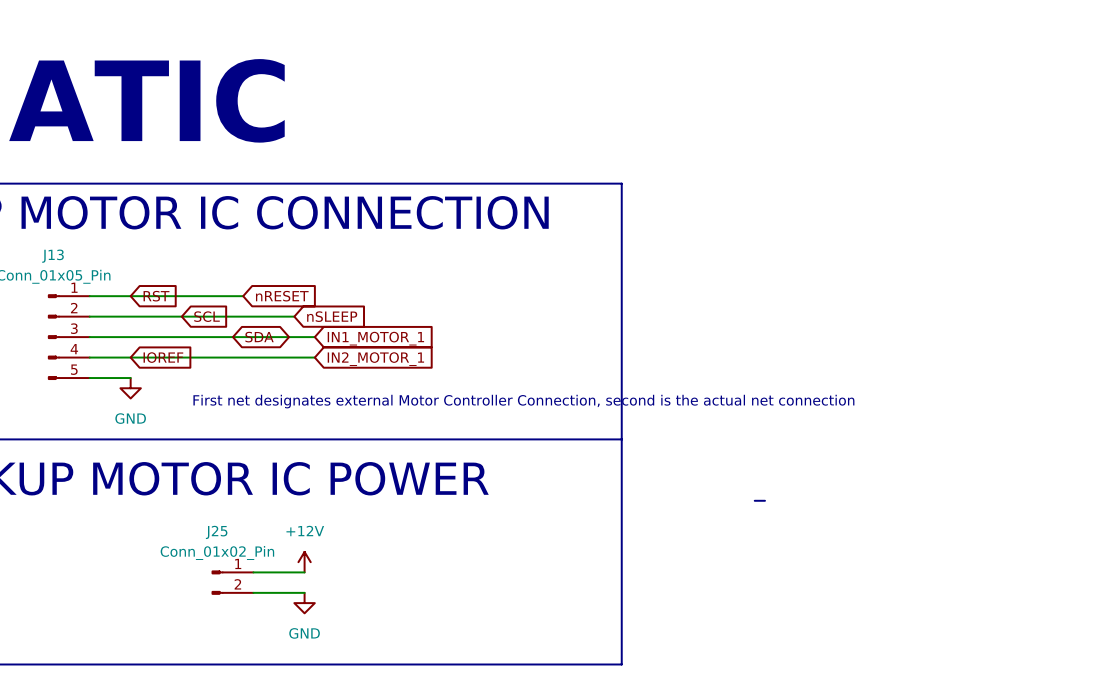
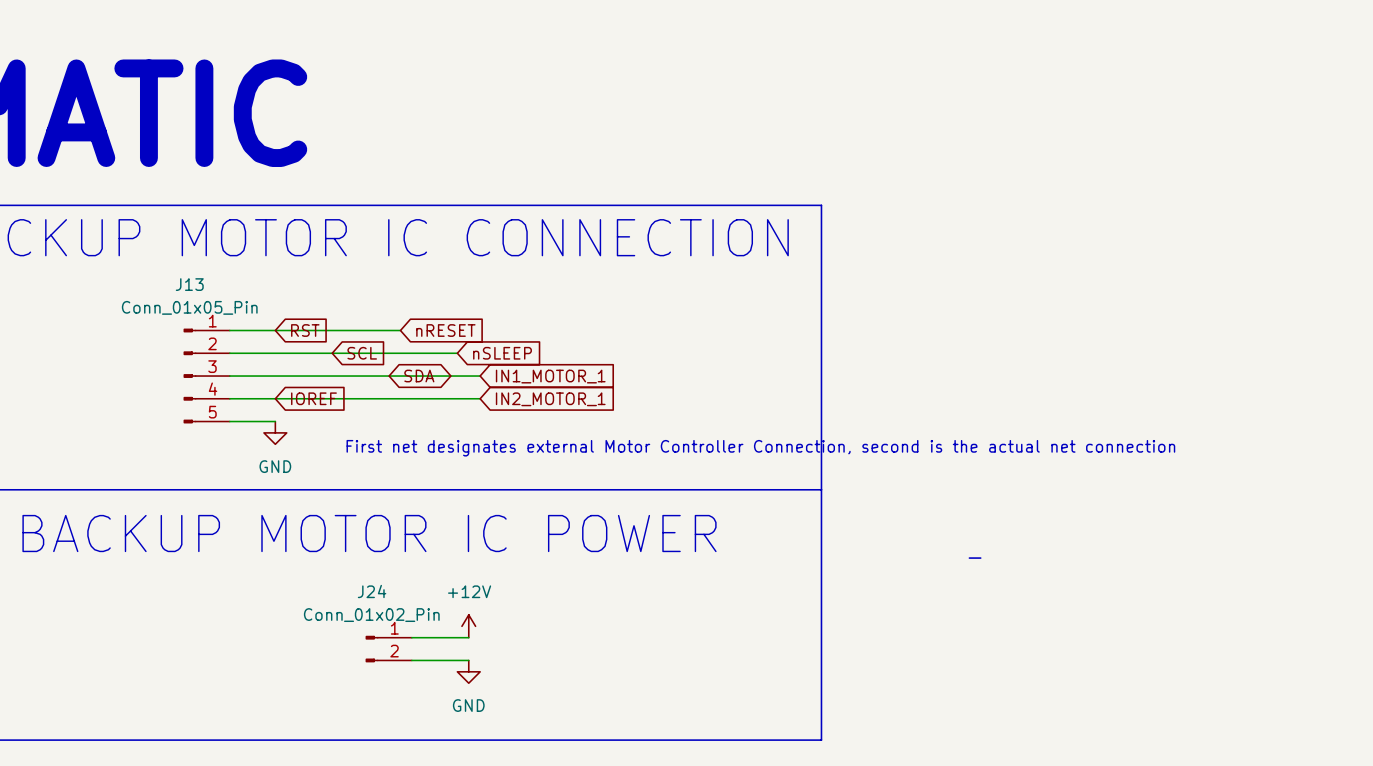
J25 name: J25 (216, 532) -> J24 (372, 591)

